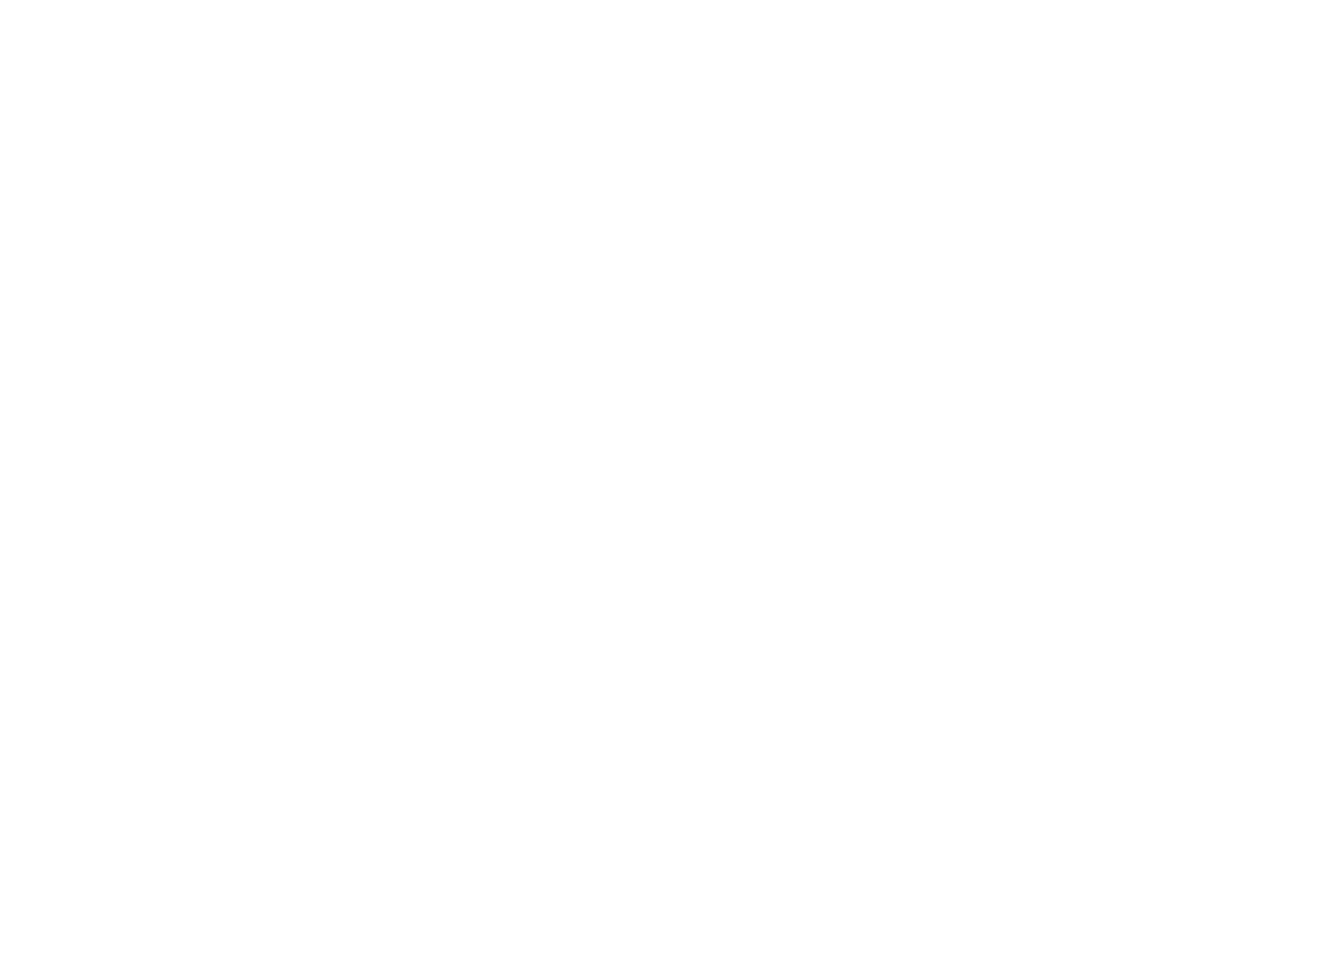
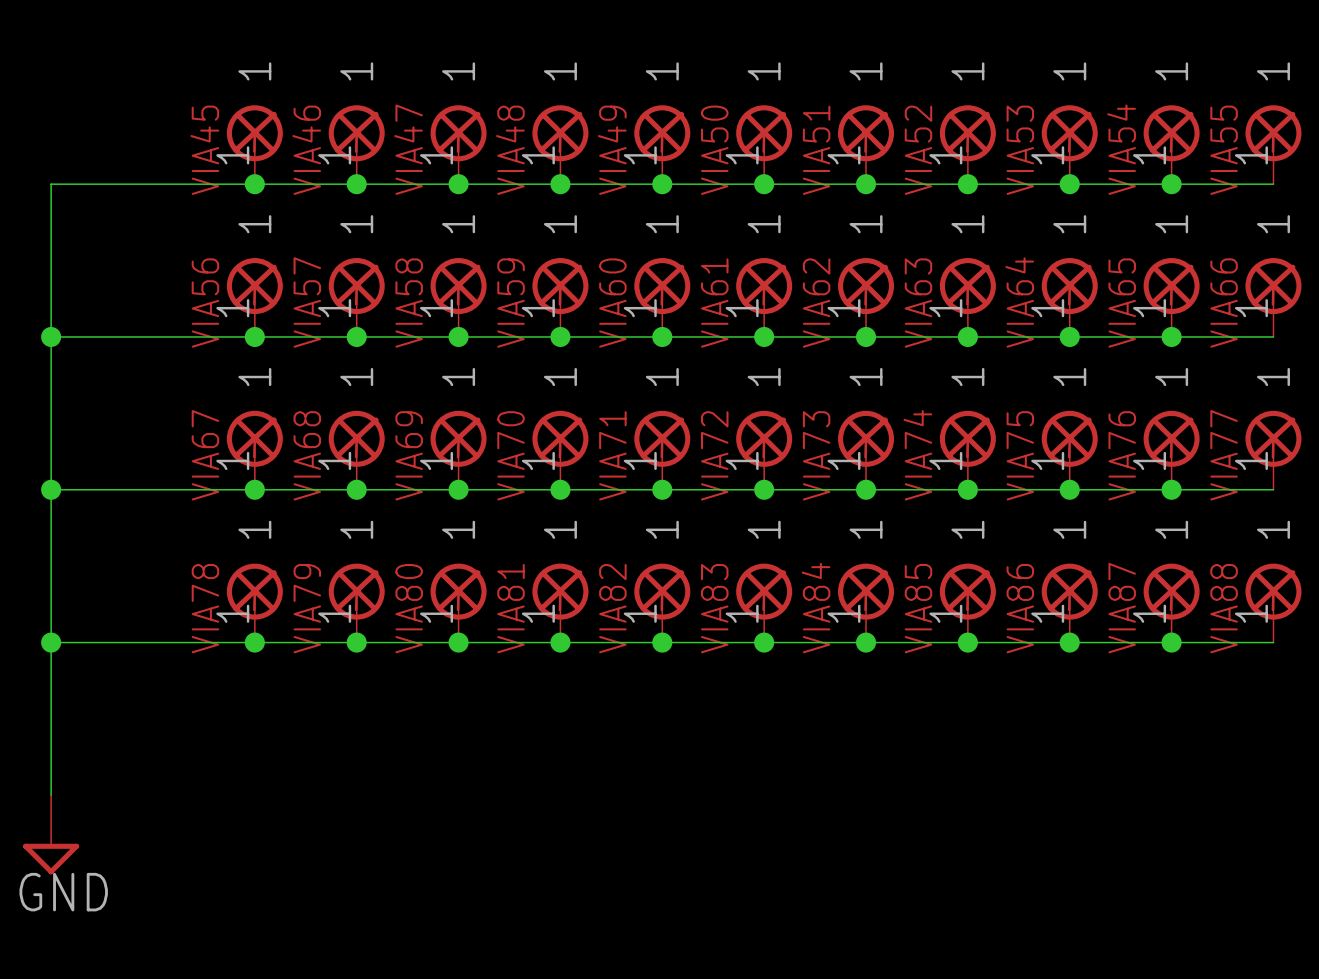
VIA45: none -> (254, 144)
VIA46: none -> (356, 144)
VIA47: none -> (458, 144)
VIA48: none -> (560, 144)
VIA49: none -> (662, 144)
VIA50: none -> (764, 144)
VIA51: none -> (866, 144)
VIA52: none -> (967, 144)
VIA53: none -> (1069, 144)
VIA54: none -> (1171, 144)
VIA55: none -> (1273, 144)
junction: none -> (254, 184)
junction: none -> (356, 184)
junction: none -> (458, 184)
junction: none -> (560, 184)
junction: none -> (662, 184)
junction: none -> (764, 184)
junction: none -> (866, 184)
junction: none -> (967, 184)
junction: none -> (1069, 184)
junction: none -> (1171, 184)
wire: none -> (1273, 184) (51, 184) (51, 795)
VIA56: none -> (254, 297)
VIA57: none -> (356, 297)
VIA58: none -> (458, 297)
VIA59: none -> (560, 297)
VIA60: none -> (662, 297)
VIA61: none -> (764, 297)
VIA62: none -> (866, 297)
VIA63: none -> (967, 297)
VIA64: none -> (1069, 297)
VIA65: none -> (1171, 297)
VIA66: none -> (1273, 297)
wire: none -> (51, 336) (1273, 336)
junction: none -> (51, 336)
junction: none -> (254, 336)
junction: none -> (356, 336)
junction: none -> (458, 336)
junction: none -> (560, 336)
junction: none -> (662, 336)
junction: none -> (764, 336)
junction: none -> (866, 336)
junction: none -> (967, 336)
junction: none -> (1069, 336)
junction: none -> (1171, 336)
VIA67: none -> (254, 450)
VIA68: none -> (356, 450)
VIA69: none -> (458, 450)
VIA70: none -> (560, 450)
VIA71: none -> (662, 450)
VIA72: none -> (764, 450)
VIA73: none -> (866, 450)
VIA74: none -> (967, 450)
VIA75: none -> (1069, 450)
VIA76: none -> (1171, 450)
VIA77: none -> (1273, 450)
wire: none -> (51, 489) (1273, 489)
junction: none -> (51, 489)
junction: none -> (254, 489)
junction: none -> (356, 489)
junction: none -> (458, 489)
junction: none -> (560, 489)
junction: none -> (662, 489)
junction: none -> (764, 489)
junction: none -> (866, 489)
junction: none -> (967, 489)
junction: none -> (1069, 489)
junction: none -> (1171, 489)
VIA78: none -> (254, 603)
VIA79: none -> (356, 603)
VIA80: none -> (458, 603)
VIA81: none -> (560, 603)
VIA82: none -> (662, 603)
VIA83: none -> (764, 603)
VIA84: none -> (866, 603)
VIA85: none -> (967, 603)
VIA86: none -> (1069, 603)
VIA87: none -> (1171, 603)
VIA88: none -> (1273, 603)
wire: none -> (51, 642) (1273, 642)
junction: none -> (51, 642)
junction: none -> (254, 642)
junction: none -> (356, 642)
junction: none -> (458, 642)
junction: none -> (560, 642)
junction: none -> (662, 642)
junction: none -> (764, 642)
junction: none -> (866, 642)
junction: none -> (967, 642)
junction: none -> (1069, 642)
junction: none -> (1171, 642)
power symbol: none -> GND (51, 834)

